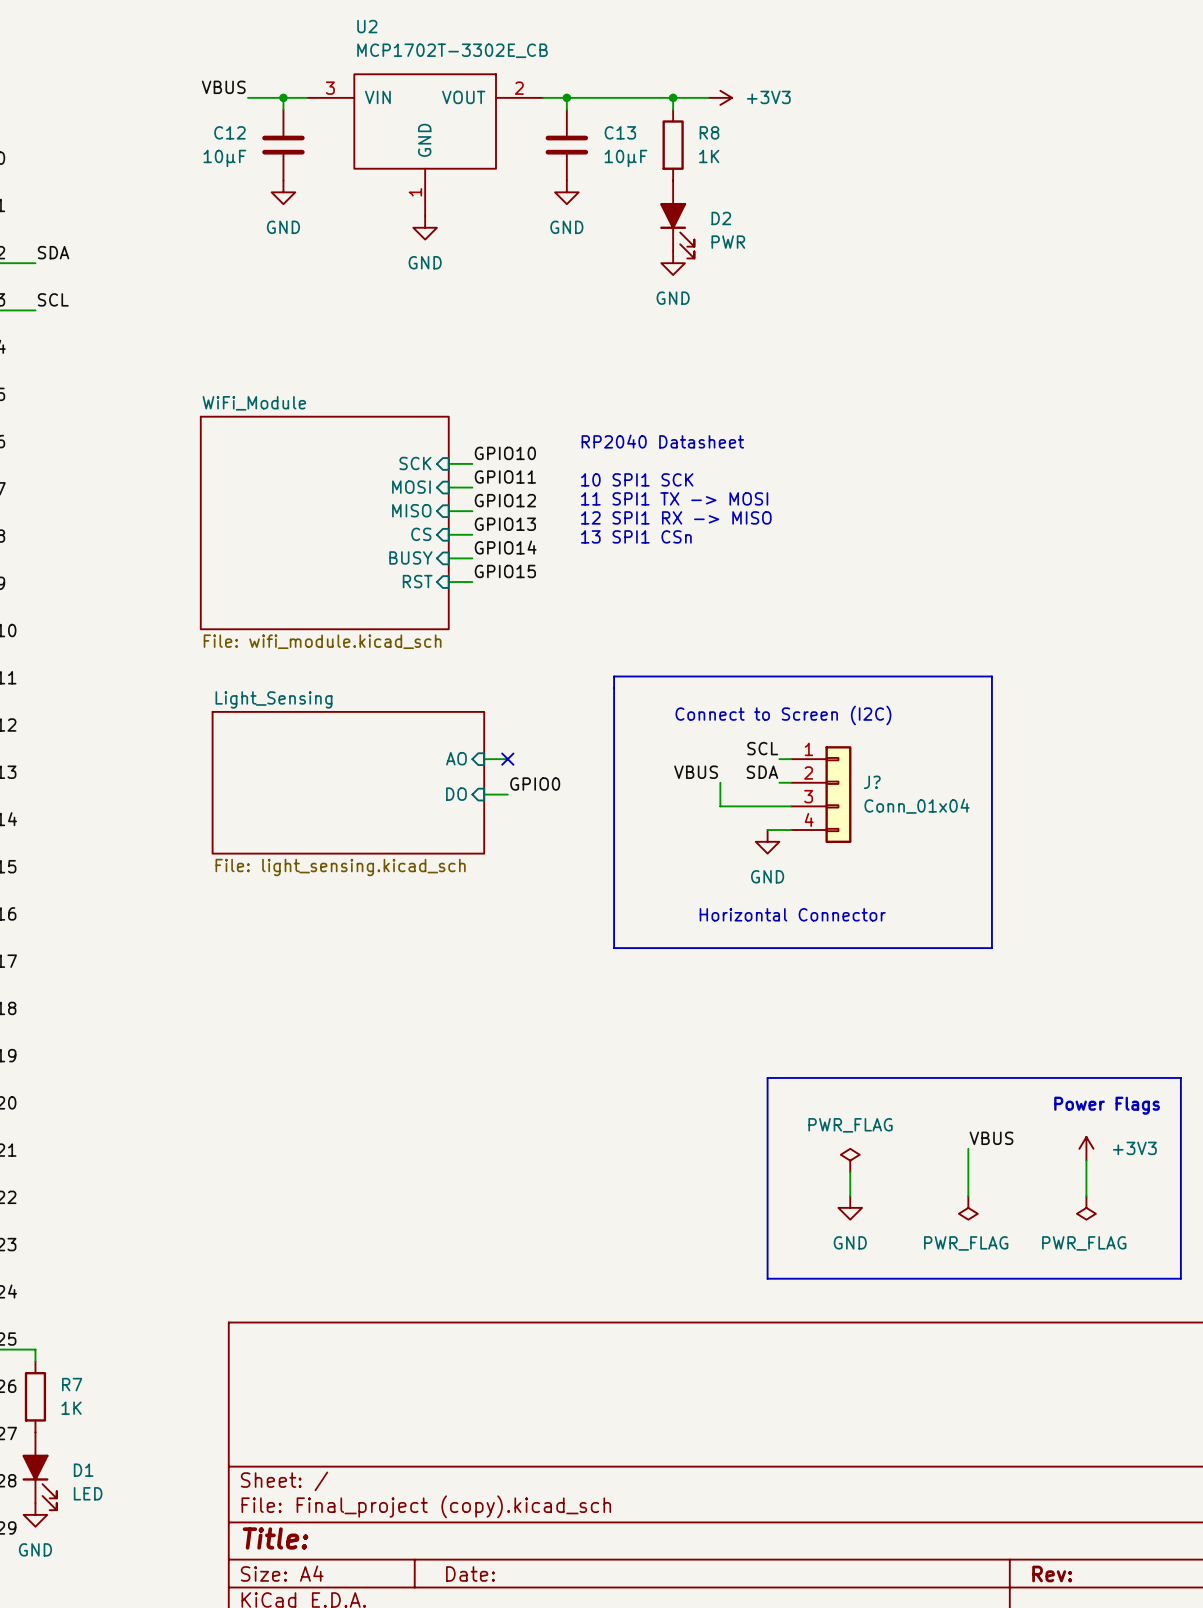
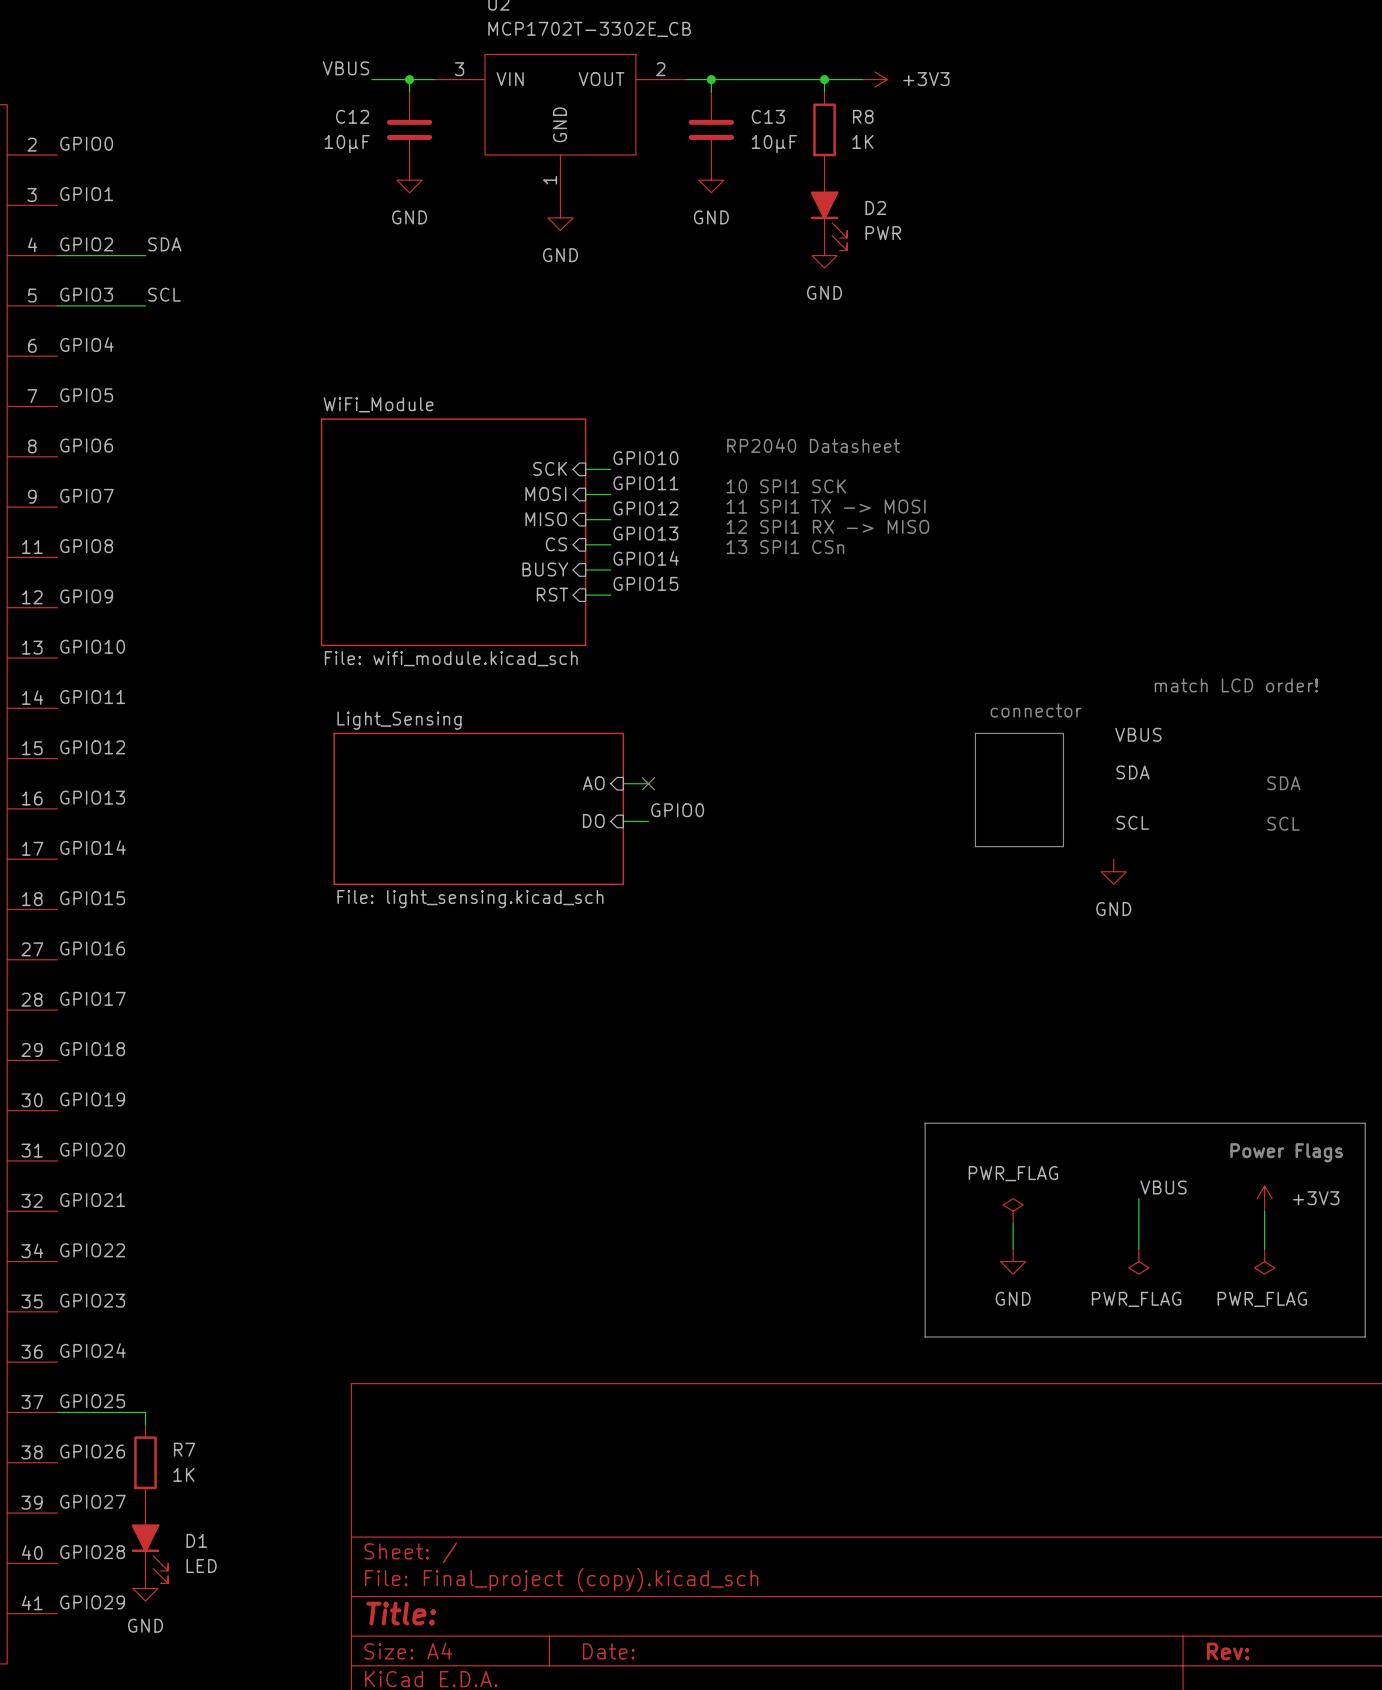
text: none -> match LCD order! (1236, 685)
line: (614, 676) (614, 948) (991, 948) (991, 676) (614, 676) -> none
text: none -> connector (1035, 710)
line: none -> (975, 733) (1063, 733) (1063, 846) (975, 846) (975, 733)
text: Connect to Screen (I2C) (783, 715) -> none
label position: SCL (762, 748) -> SCL (1132, 822)
text: none -> SDA (1283, 783)
wire: (779, 759) (791, 759) -> none
label position: VBUS (696, 772) -> VBUS (1138, 734)
label position: SDA (762, 772) -> SDA (1132, 772)
wire: (720, 782) (720, 806) (791, 806) -> none
wire: (779, 782) (791, 782) -> none
J?: Conn_01x04 (821, 794) -> none
text: none -> SCL (1283, 823)
wire: (767, 830) (791, 830) -> none
power symbol position: GND (767, 841) -> GND (1113, 871)
text: Horizontal Connector (792, 914) -> none

